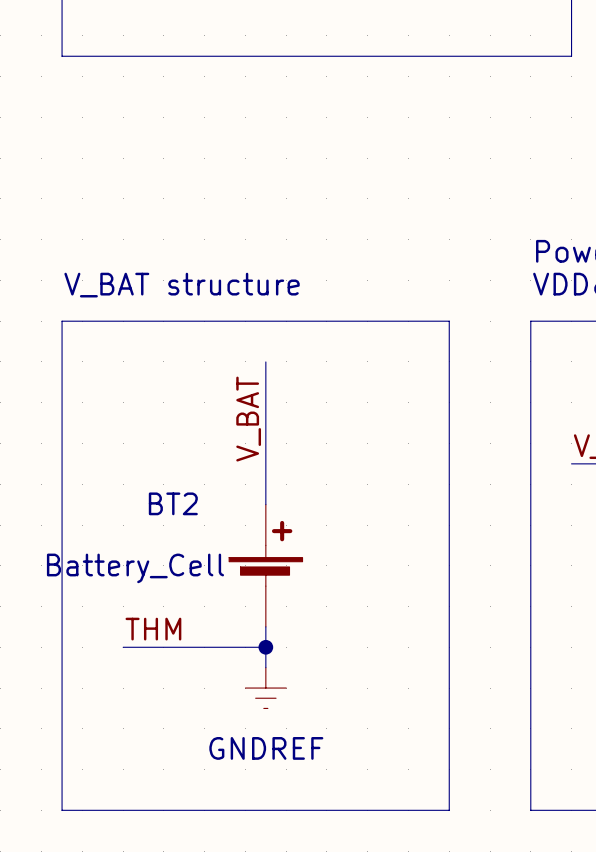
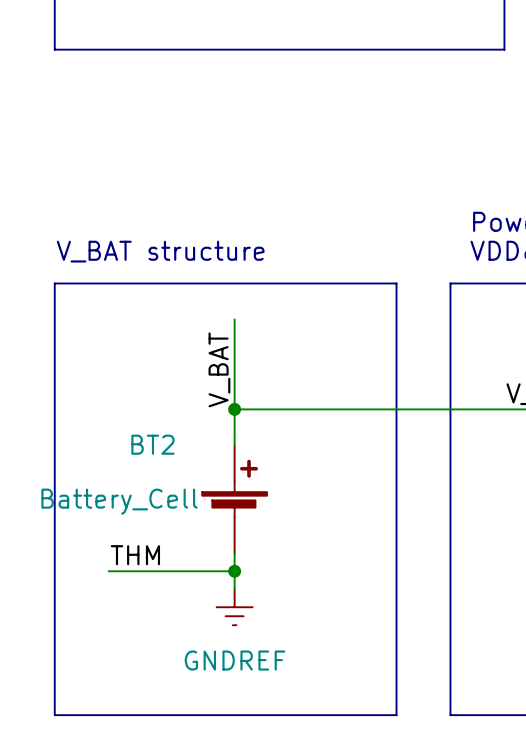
line: (530, 321) (530, 810) -> (468, 283) (450, 283) (450, 715) (468, 715)
wire: none -> (234, 409) (504, 409)
junction: none -> (234, 409)

